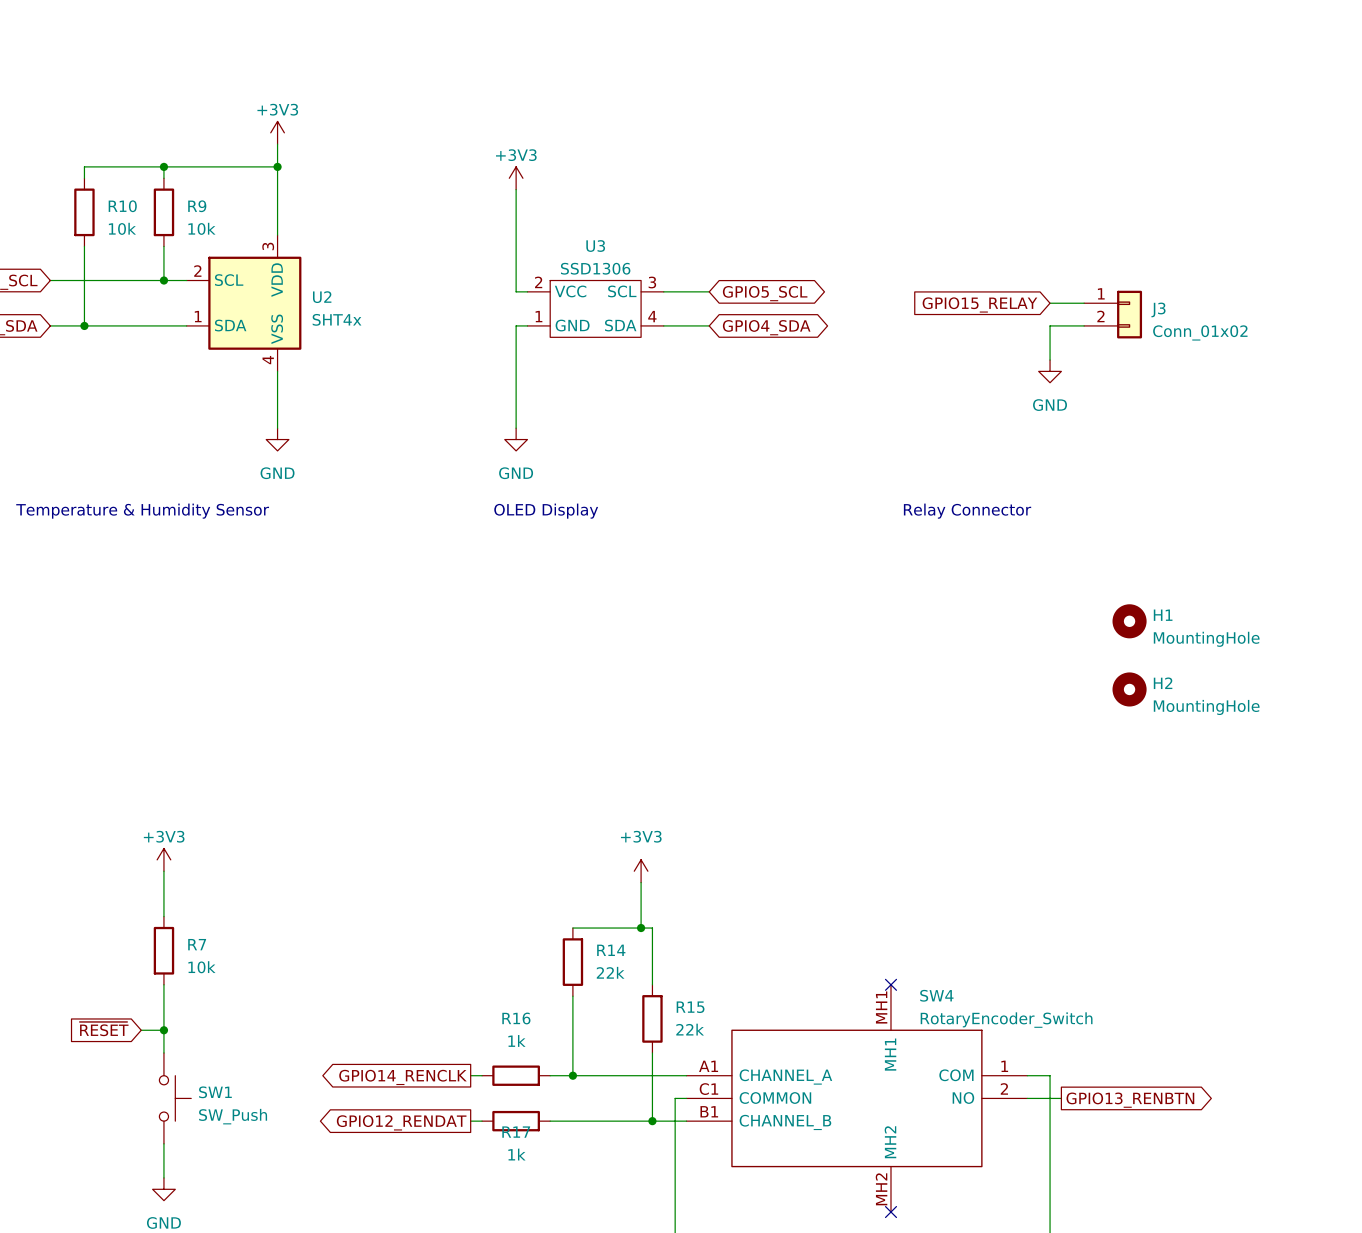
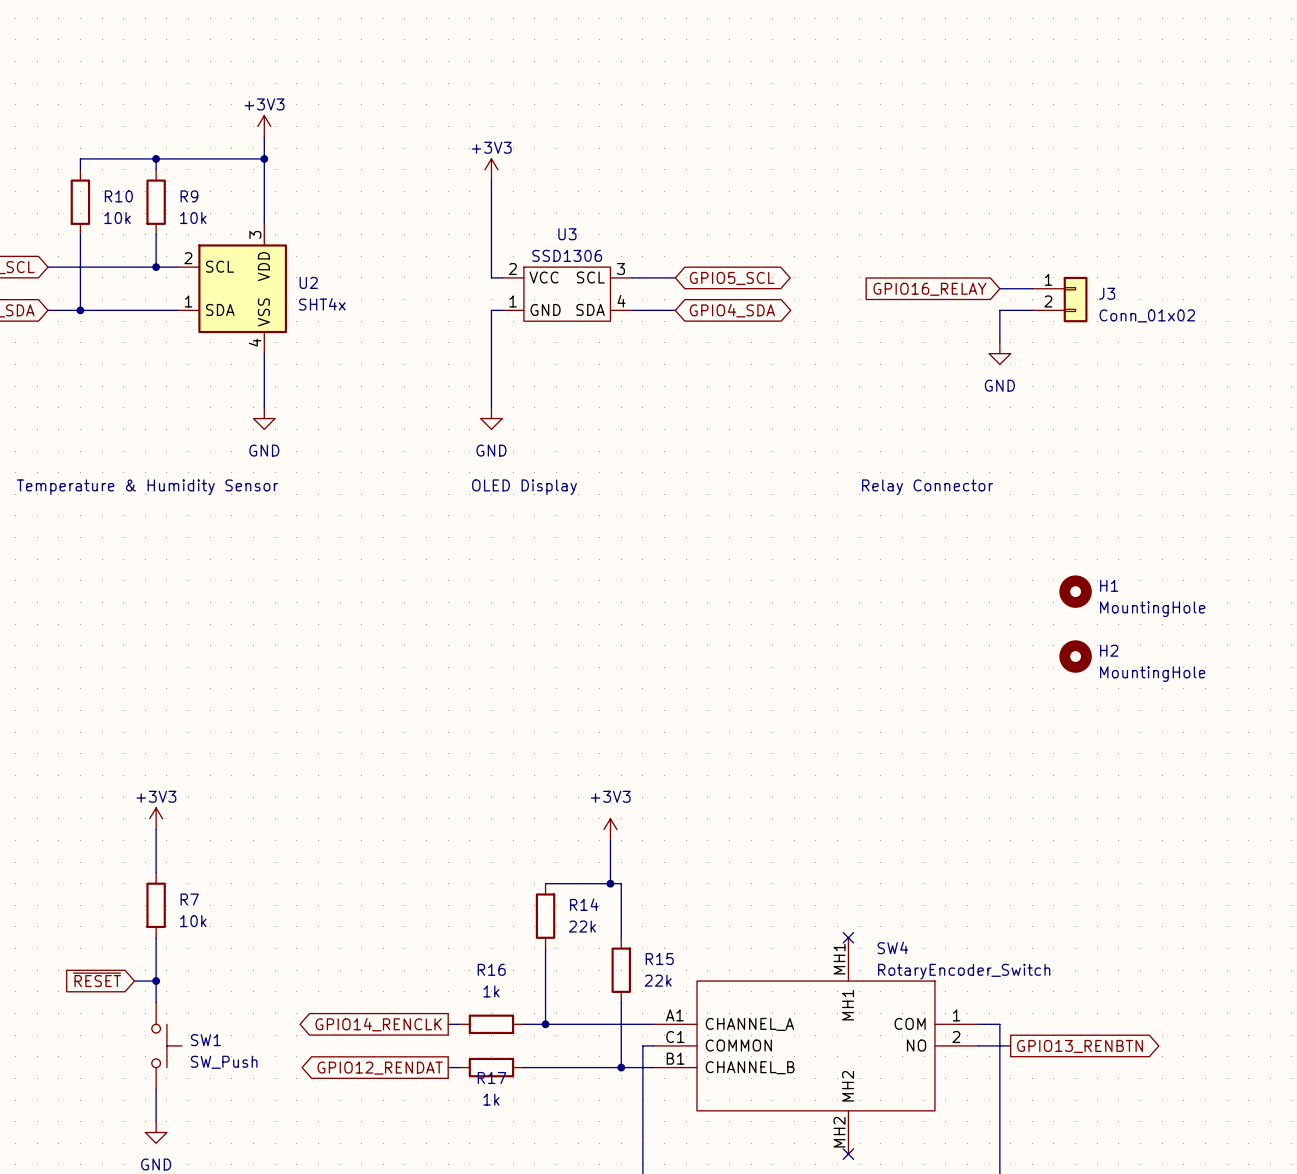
global label: GPIO15_RELAY (979, 304) -> GPIO16_RELAY (929, 289)

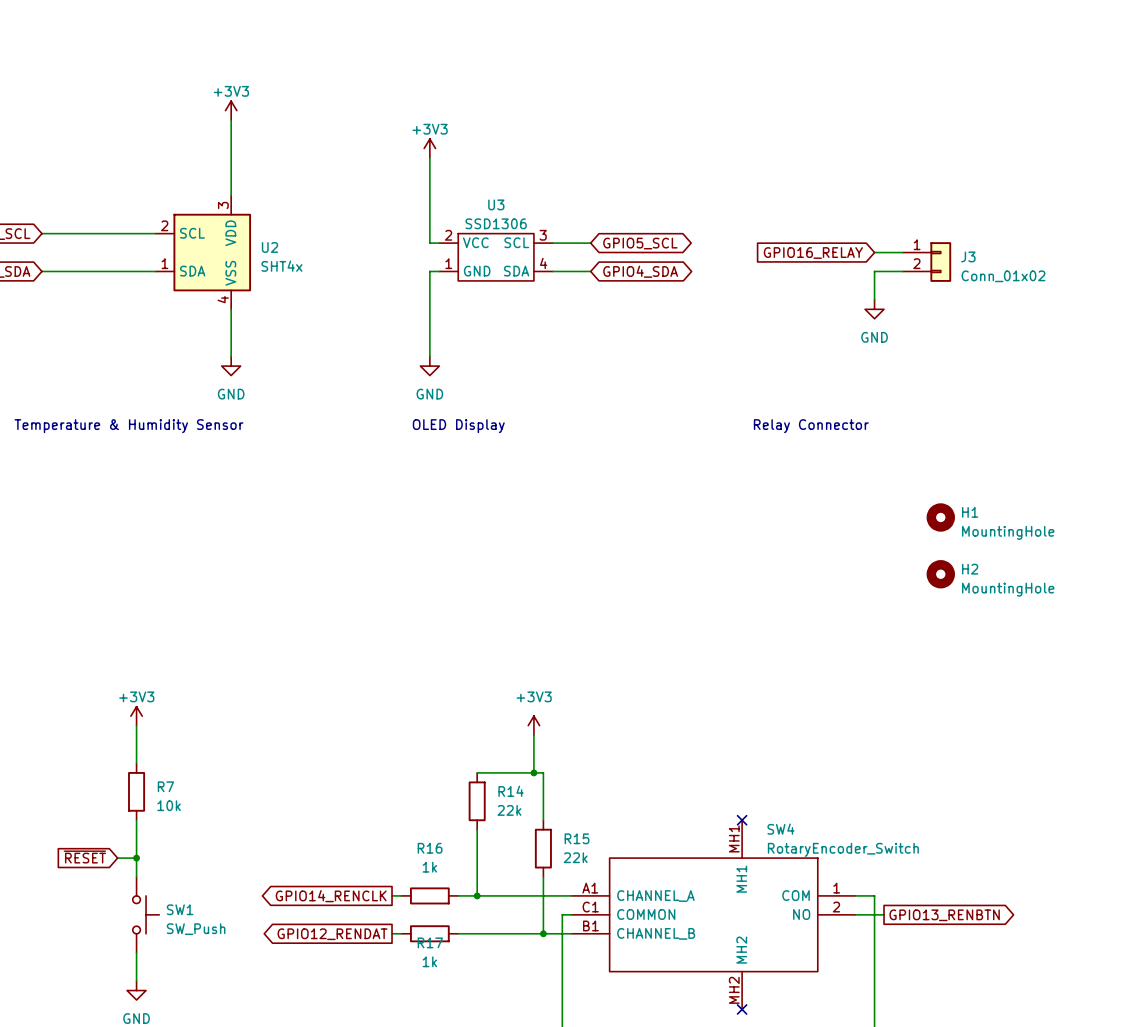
wire: (156, 158) (156, 169) -> none
junction: (156, 158) -> none
wire: (264, 158) (80, 158) (80, 169) -> none
junction: (264, 158) -> none
R10: 10k (80, 202) -> none
R9: 10k (156, 202) -> none
wire: (80, 234) (80, 310) -> none
wire: (156, 234) (156, 267) -> none
junction: (156, 267) -> none
junction: (80, 310) -> none

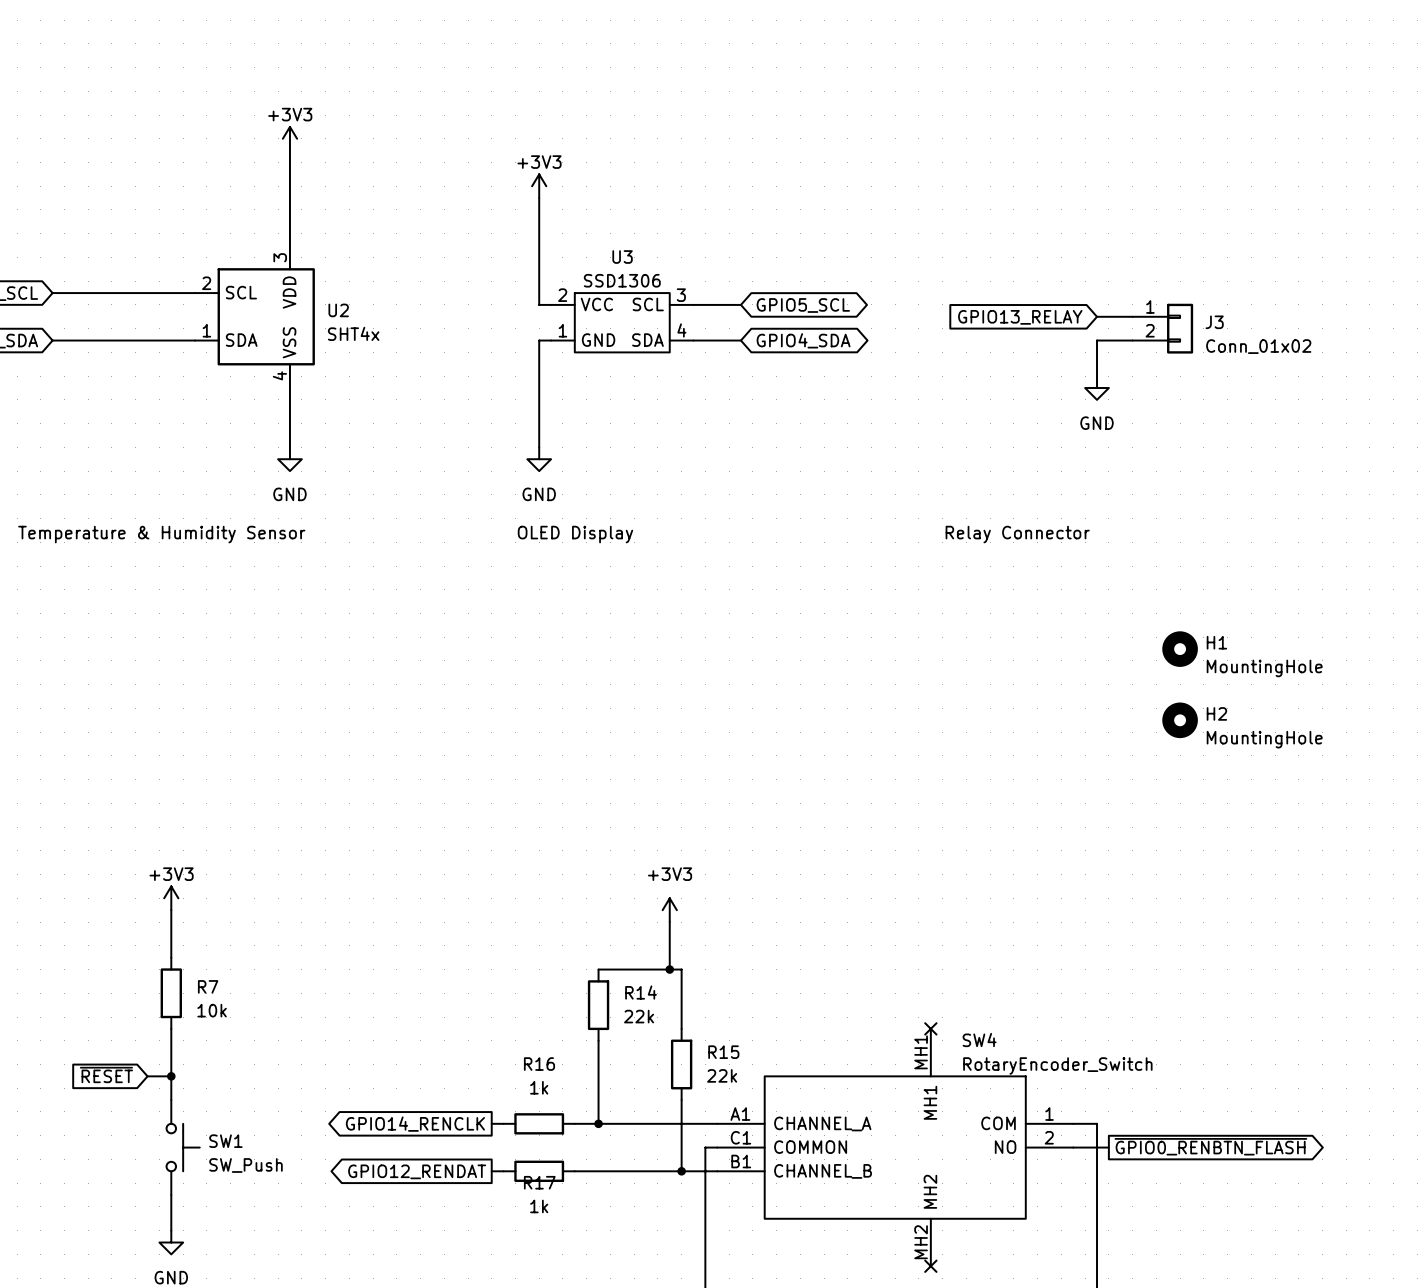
global label: GPIO16_RELAY (813, 253) -> GPIO13_RELAY (1020, 317)
global label: GPIO13_RENBTN (944, 915) -> ~{GPIO0_RENBTN_FLASH} (1210, 1146)

